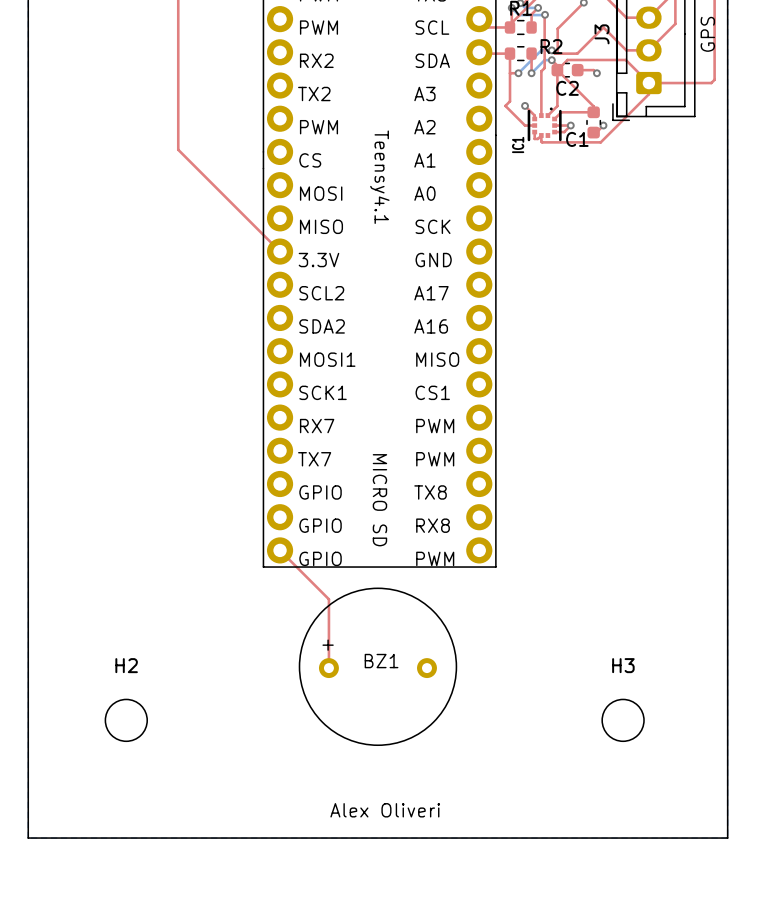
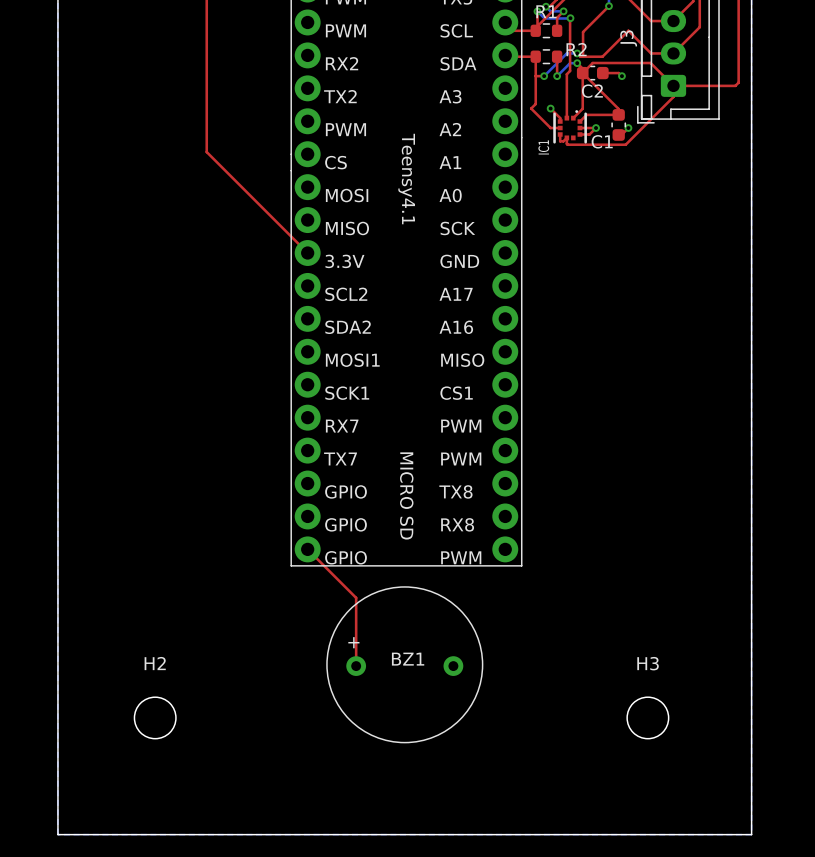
text: GPS (707, 34) -> none
text: Alex Oliveri (385, 810) -> none

